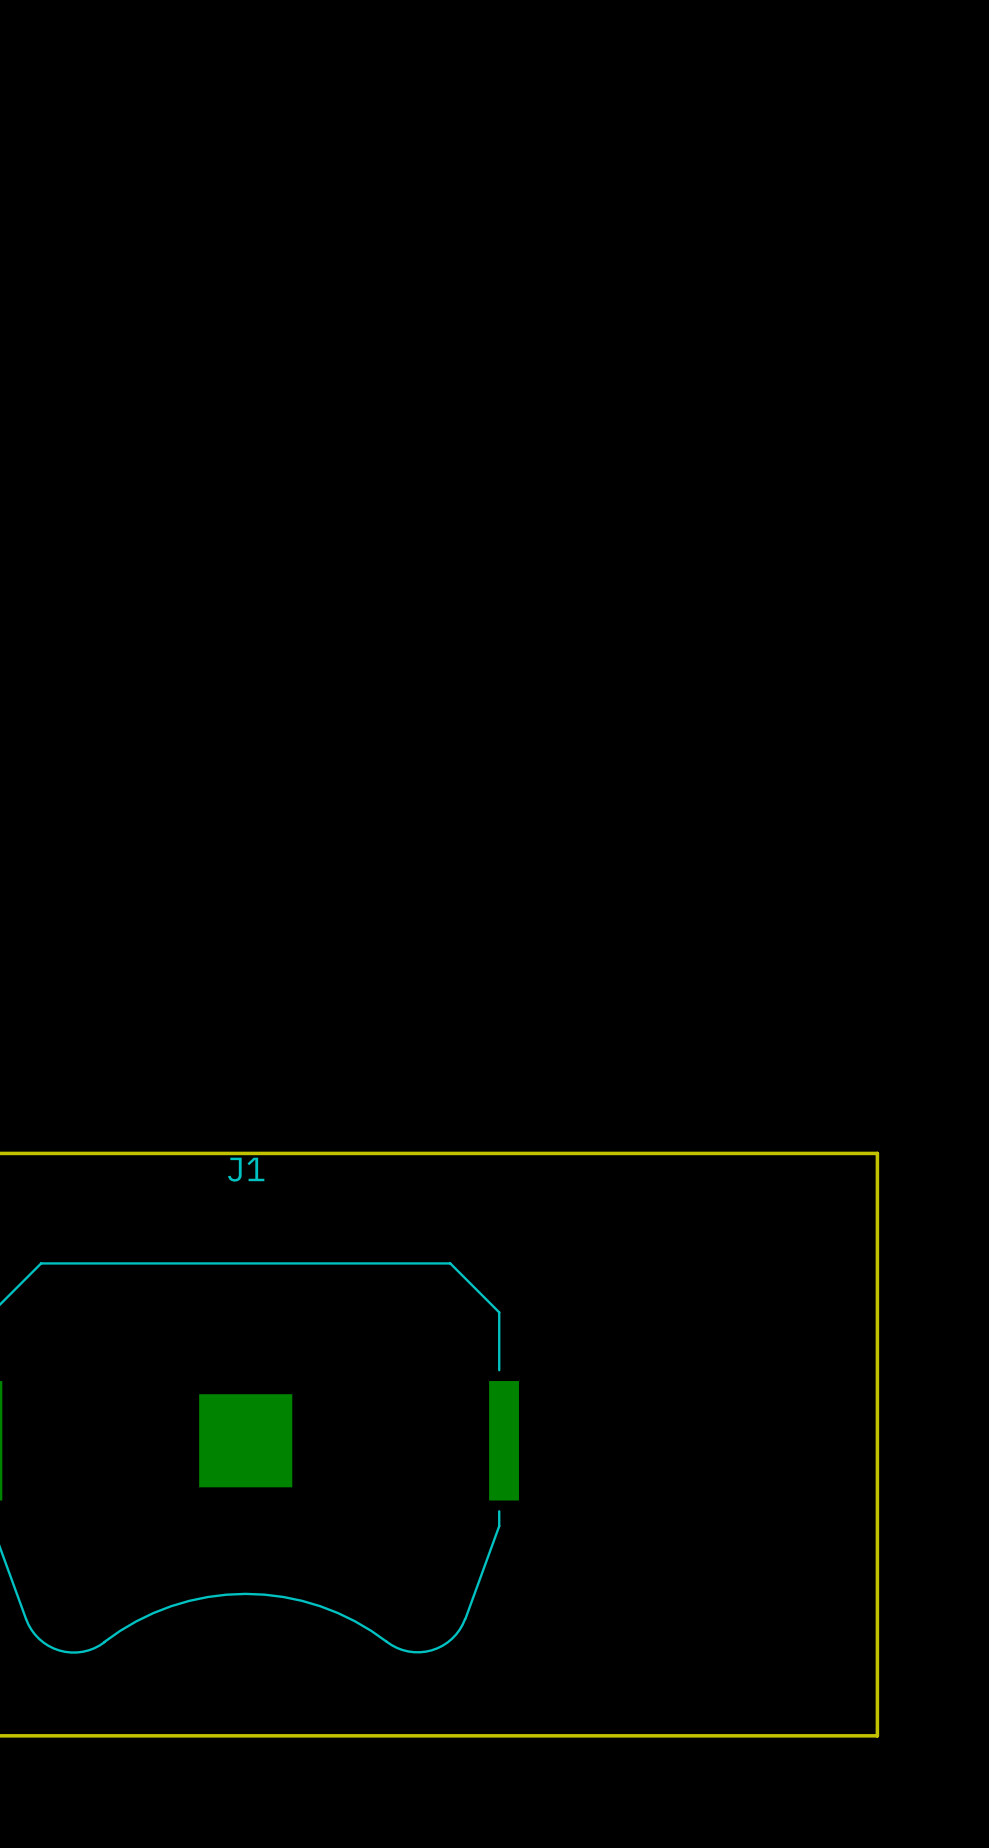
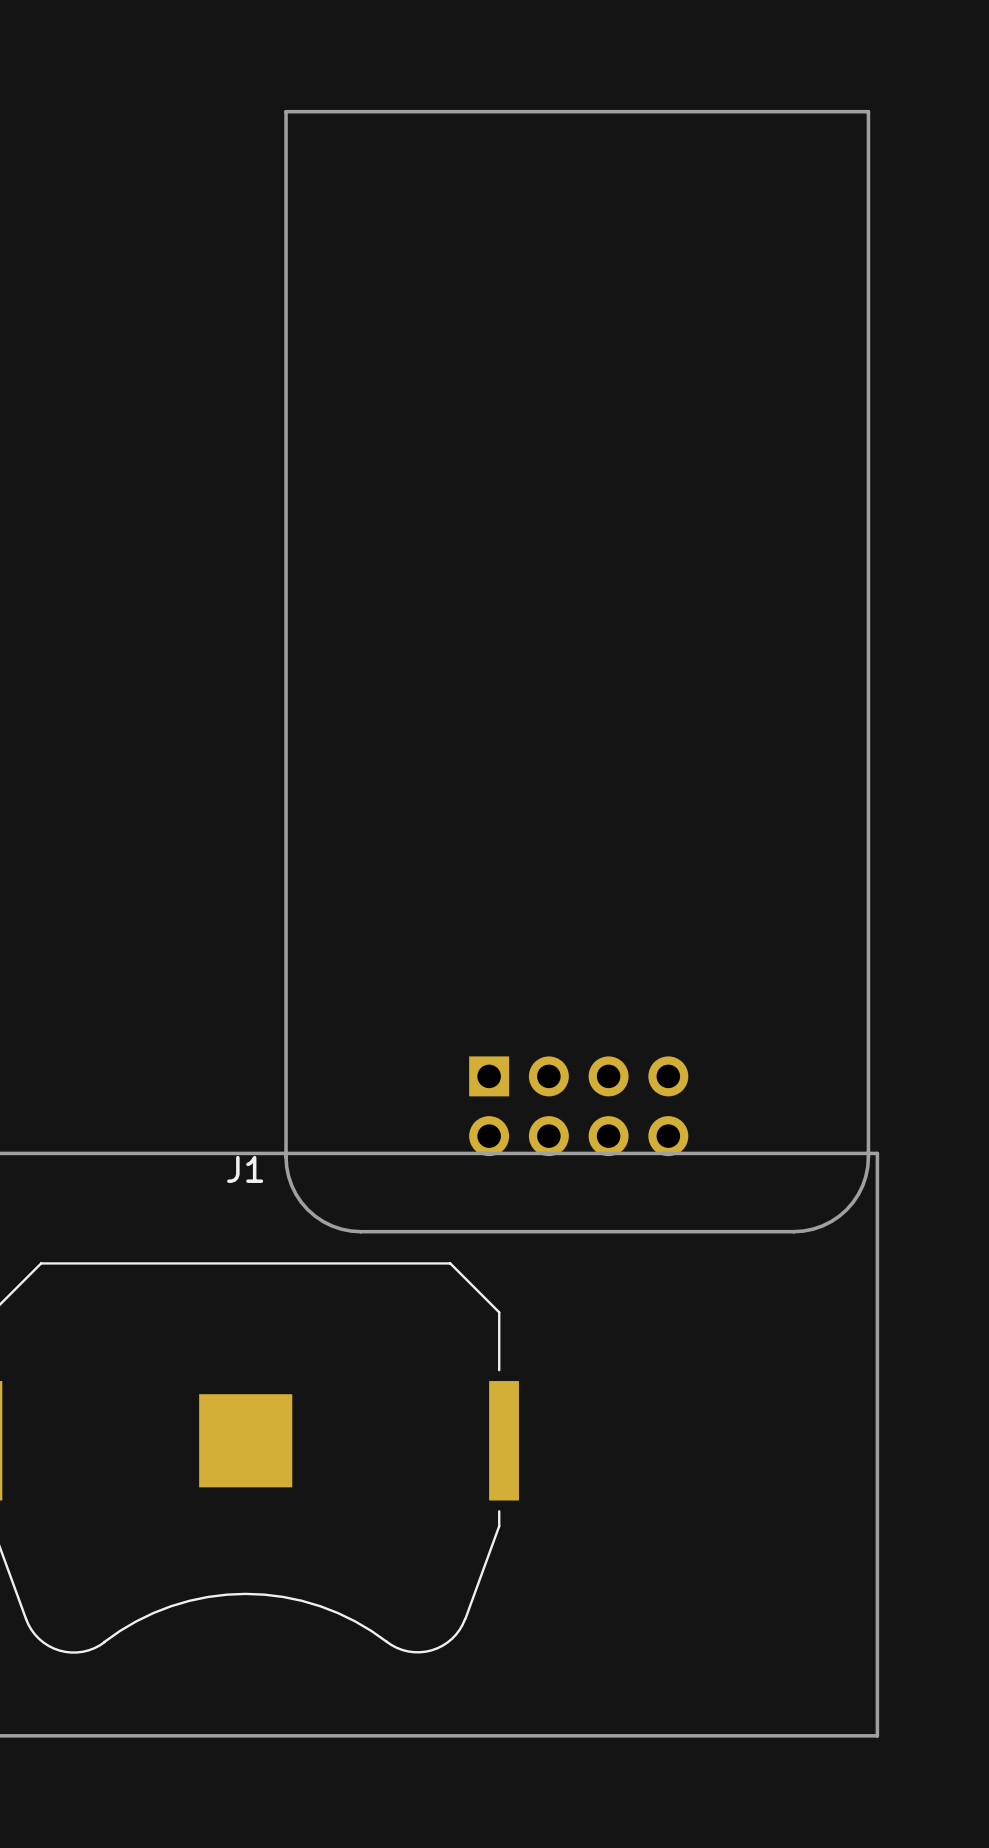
board edge: none -> (868, 111) (286, 111) (286, 1157) (288, 1176) (296, 1194) (315, 1216) (332, 1226) (360, 1231) (803, 1231) (822, 1226) (839, 1216) (853, 1202) (862, 1185) (868, 1157) (868, 111)
part: none -> (578, 1106)

